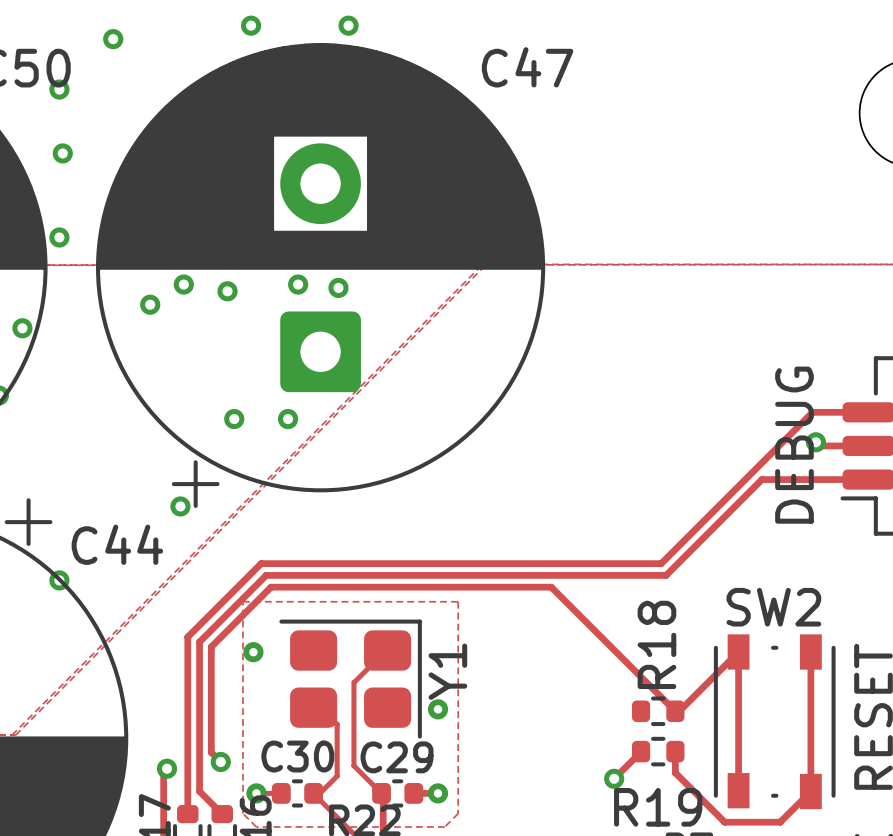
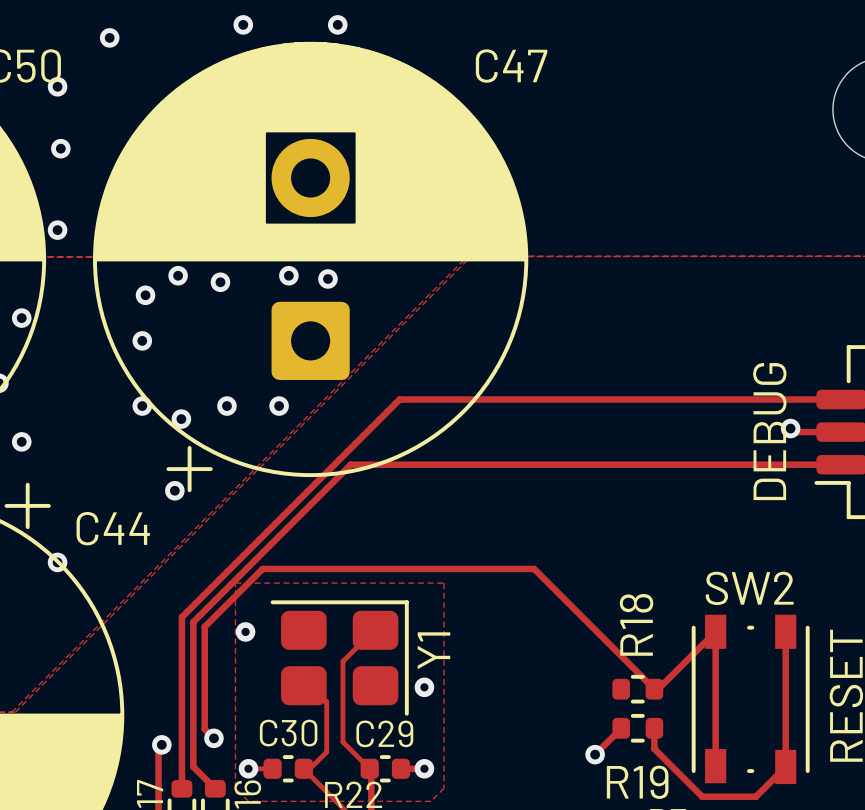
via: none -> (142, 340)
track: (812, 412) (661, 563) (261, 563) -> (787, 399) (399, 399) (253, 546)
via: none -> (142, 406)
via: none -> (181, 419)
via: none -> (21, 441)
track: (761, 479) (666, 575) (266, 575) -> (738, 464) (350, 464) (257, 557)

